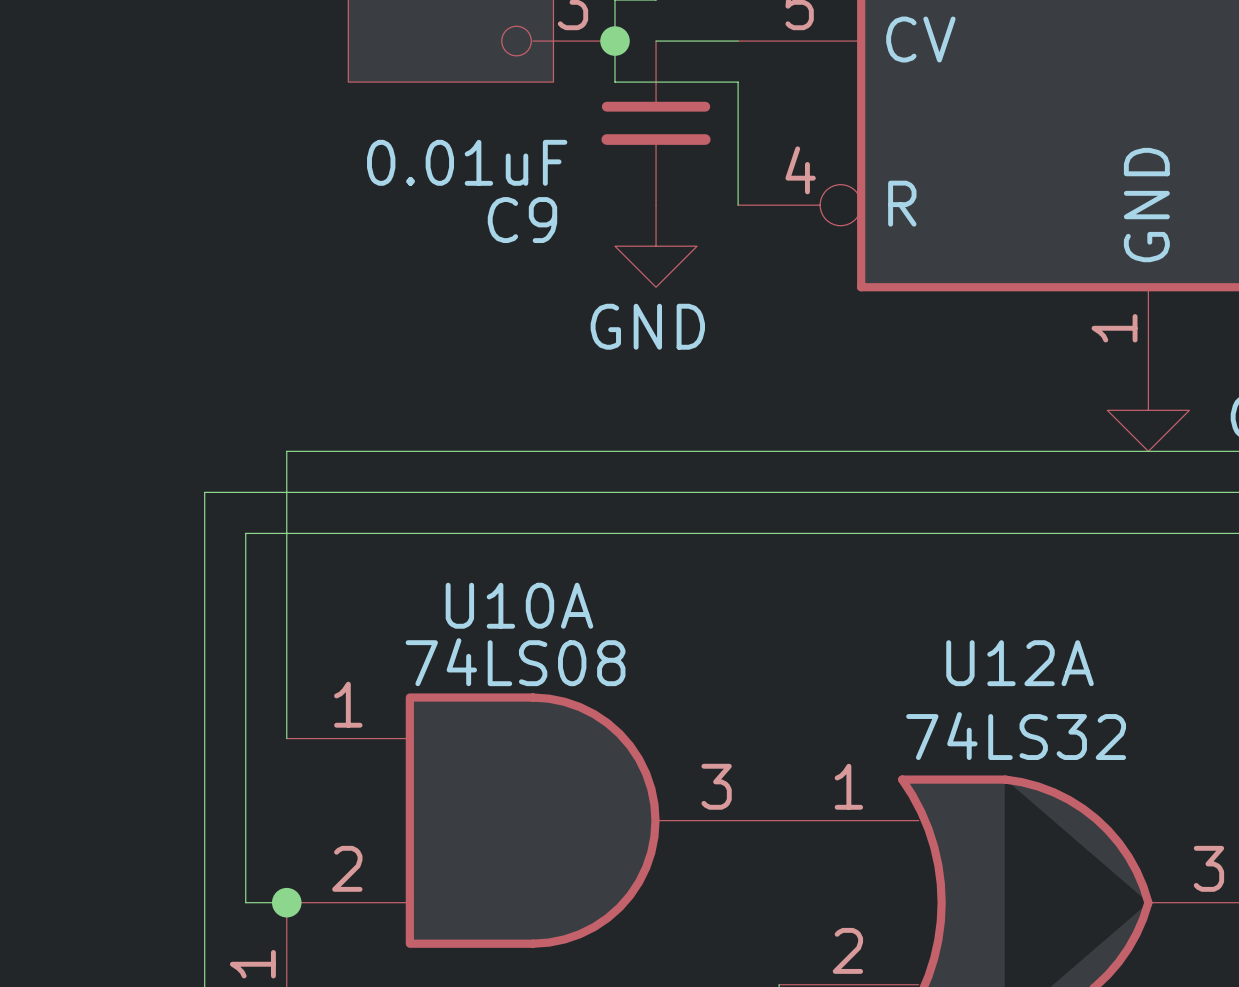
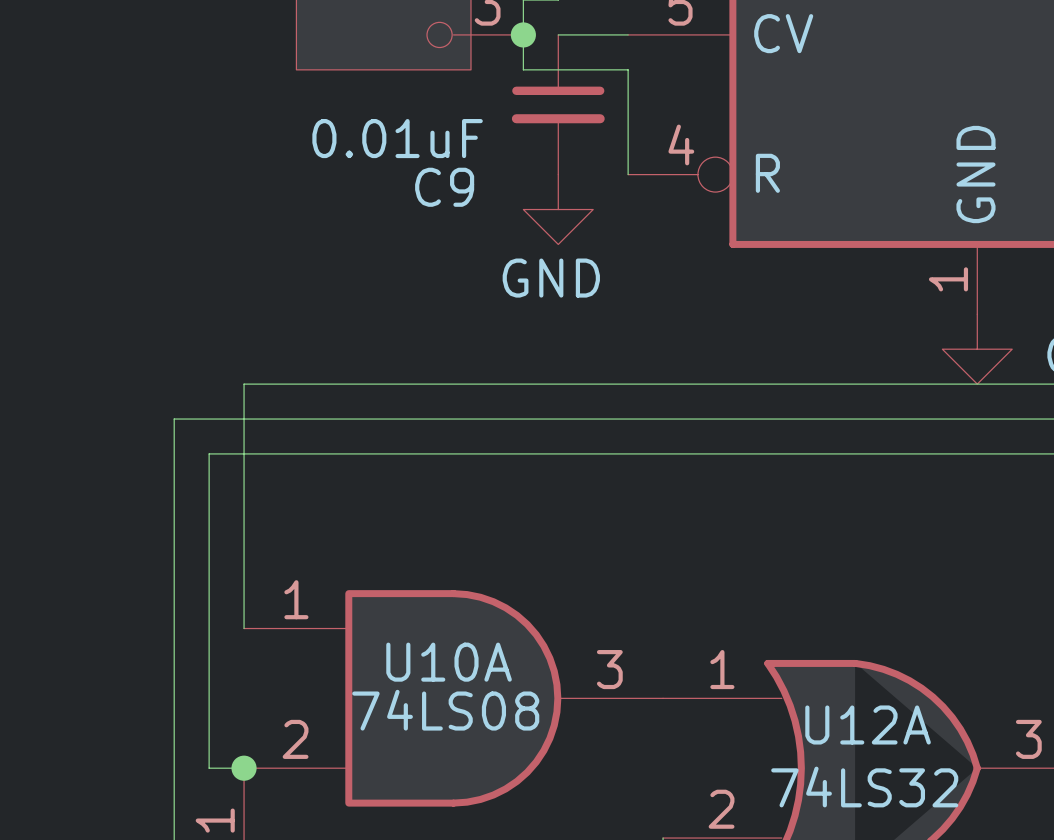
U10A name position: U10A (519, 605) -> U10A (449, 662)
U10A value position: 74LS08 (515, 662) -> 74LS08 (445, 710)
U12A name position: U12A (1020, 663) -> U12A (868, 724)
U12A value position: 74LS32 (1016, 736) -> 74LS32 (864, 787)

